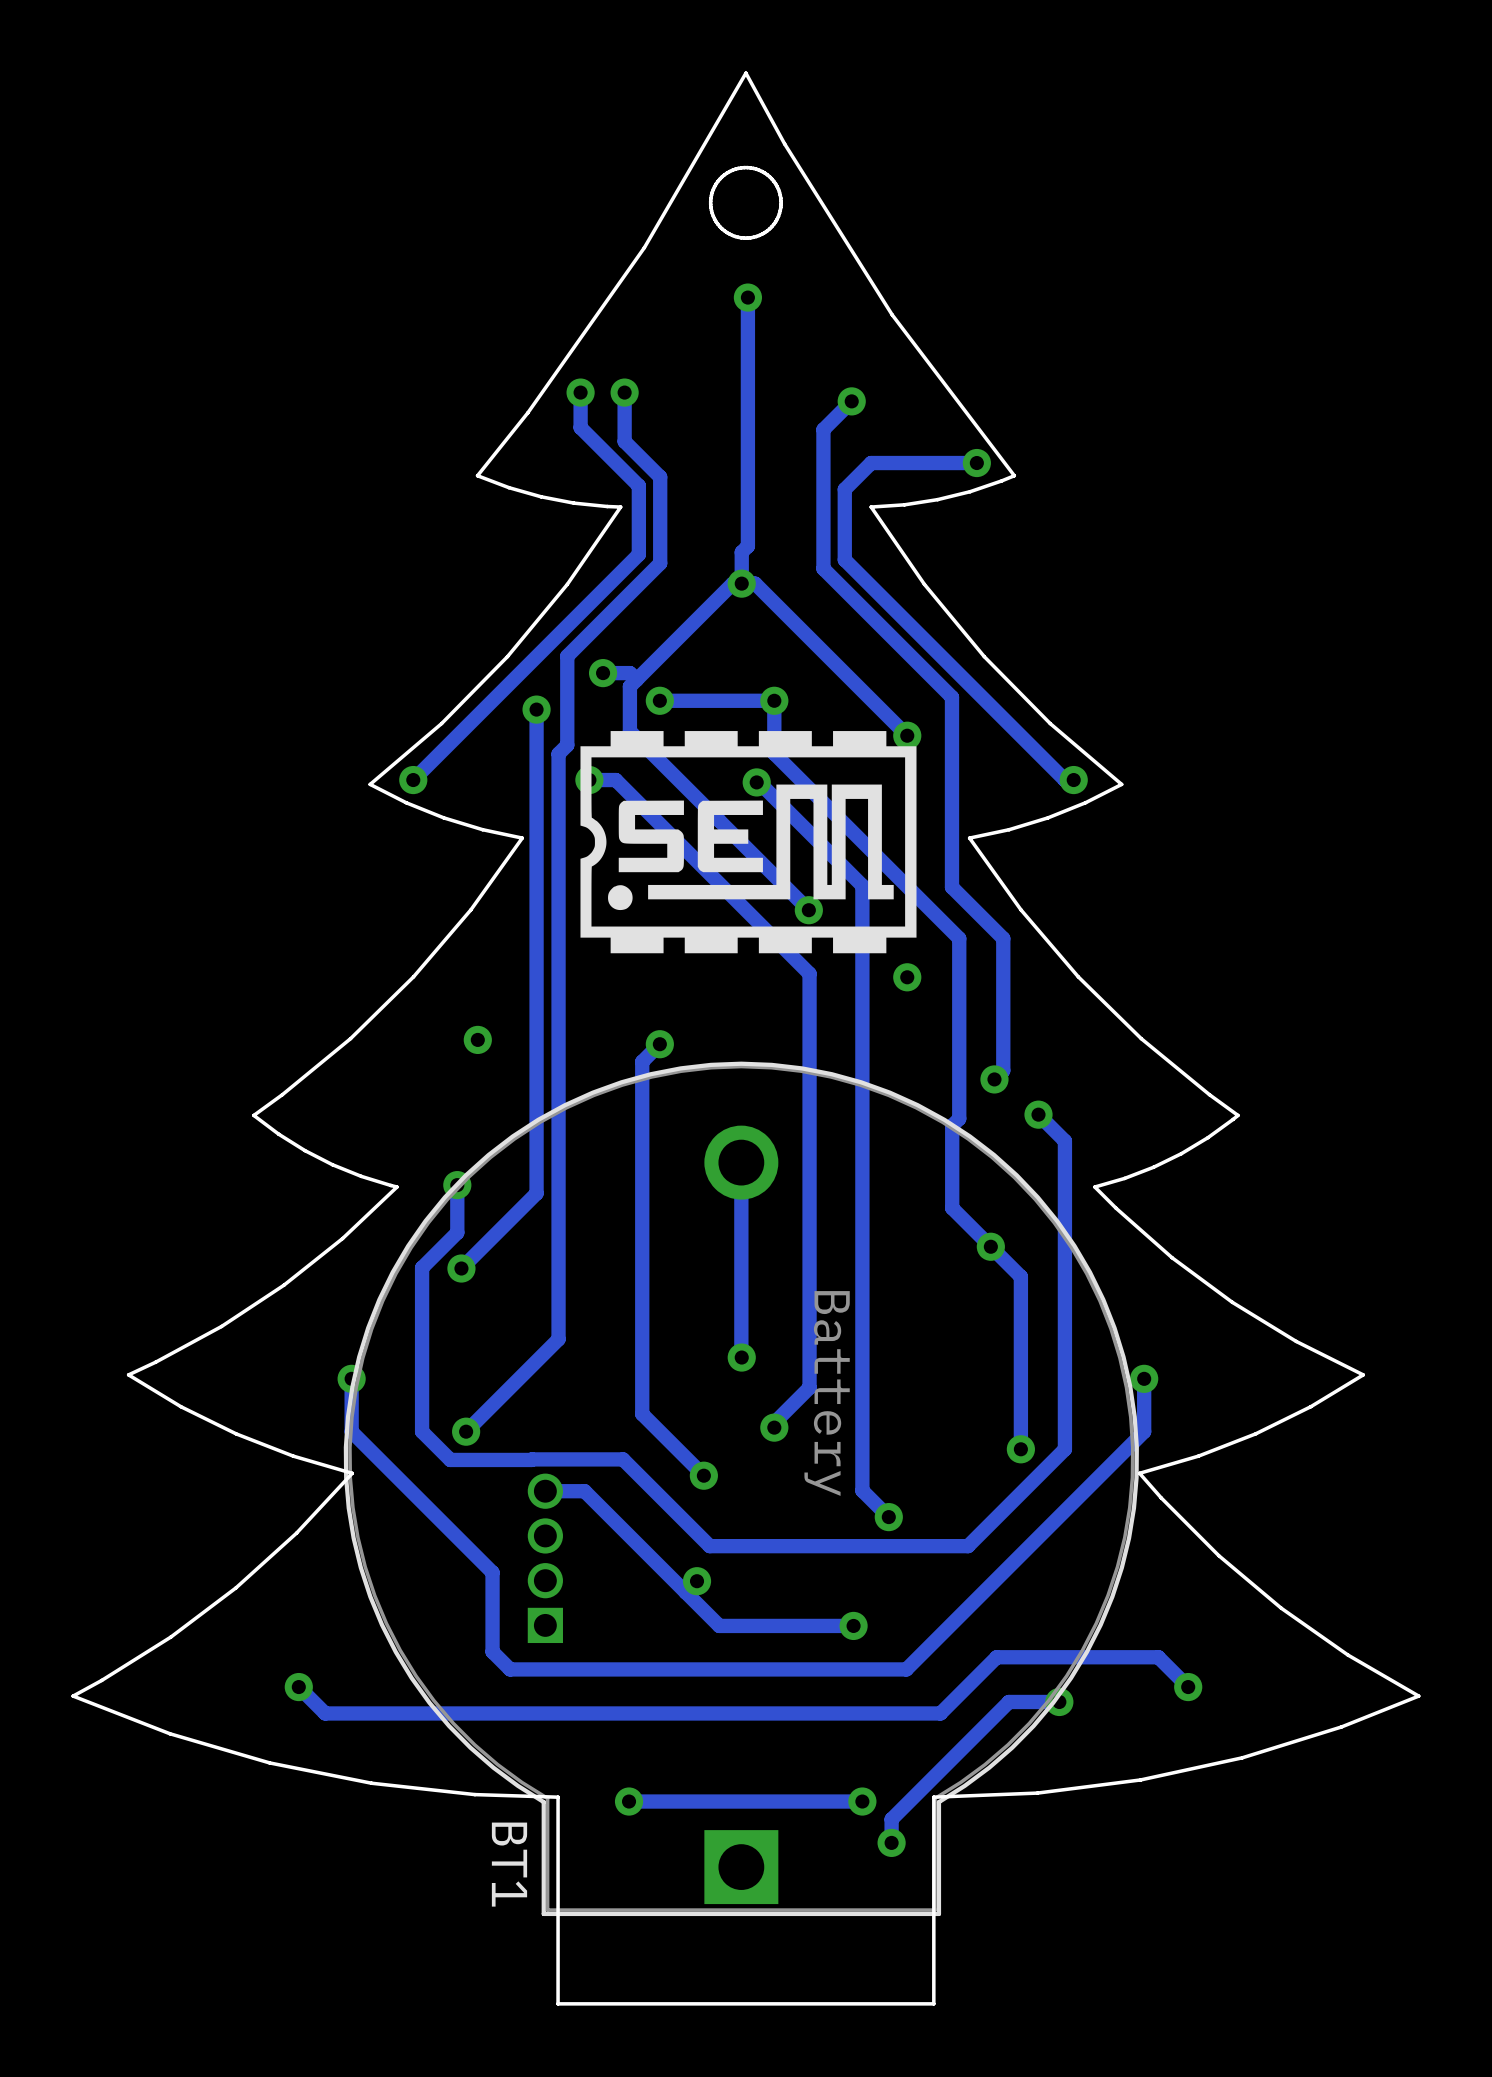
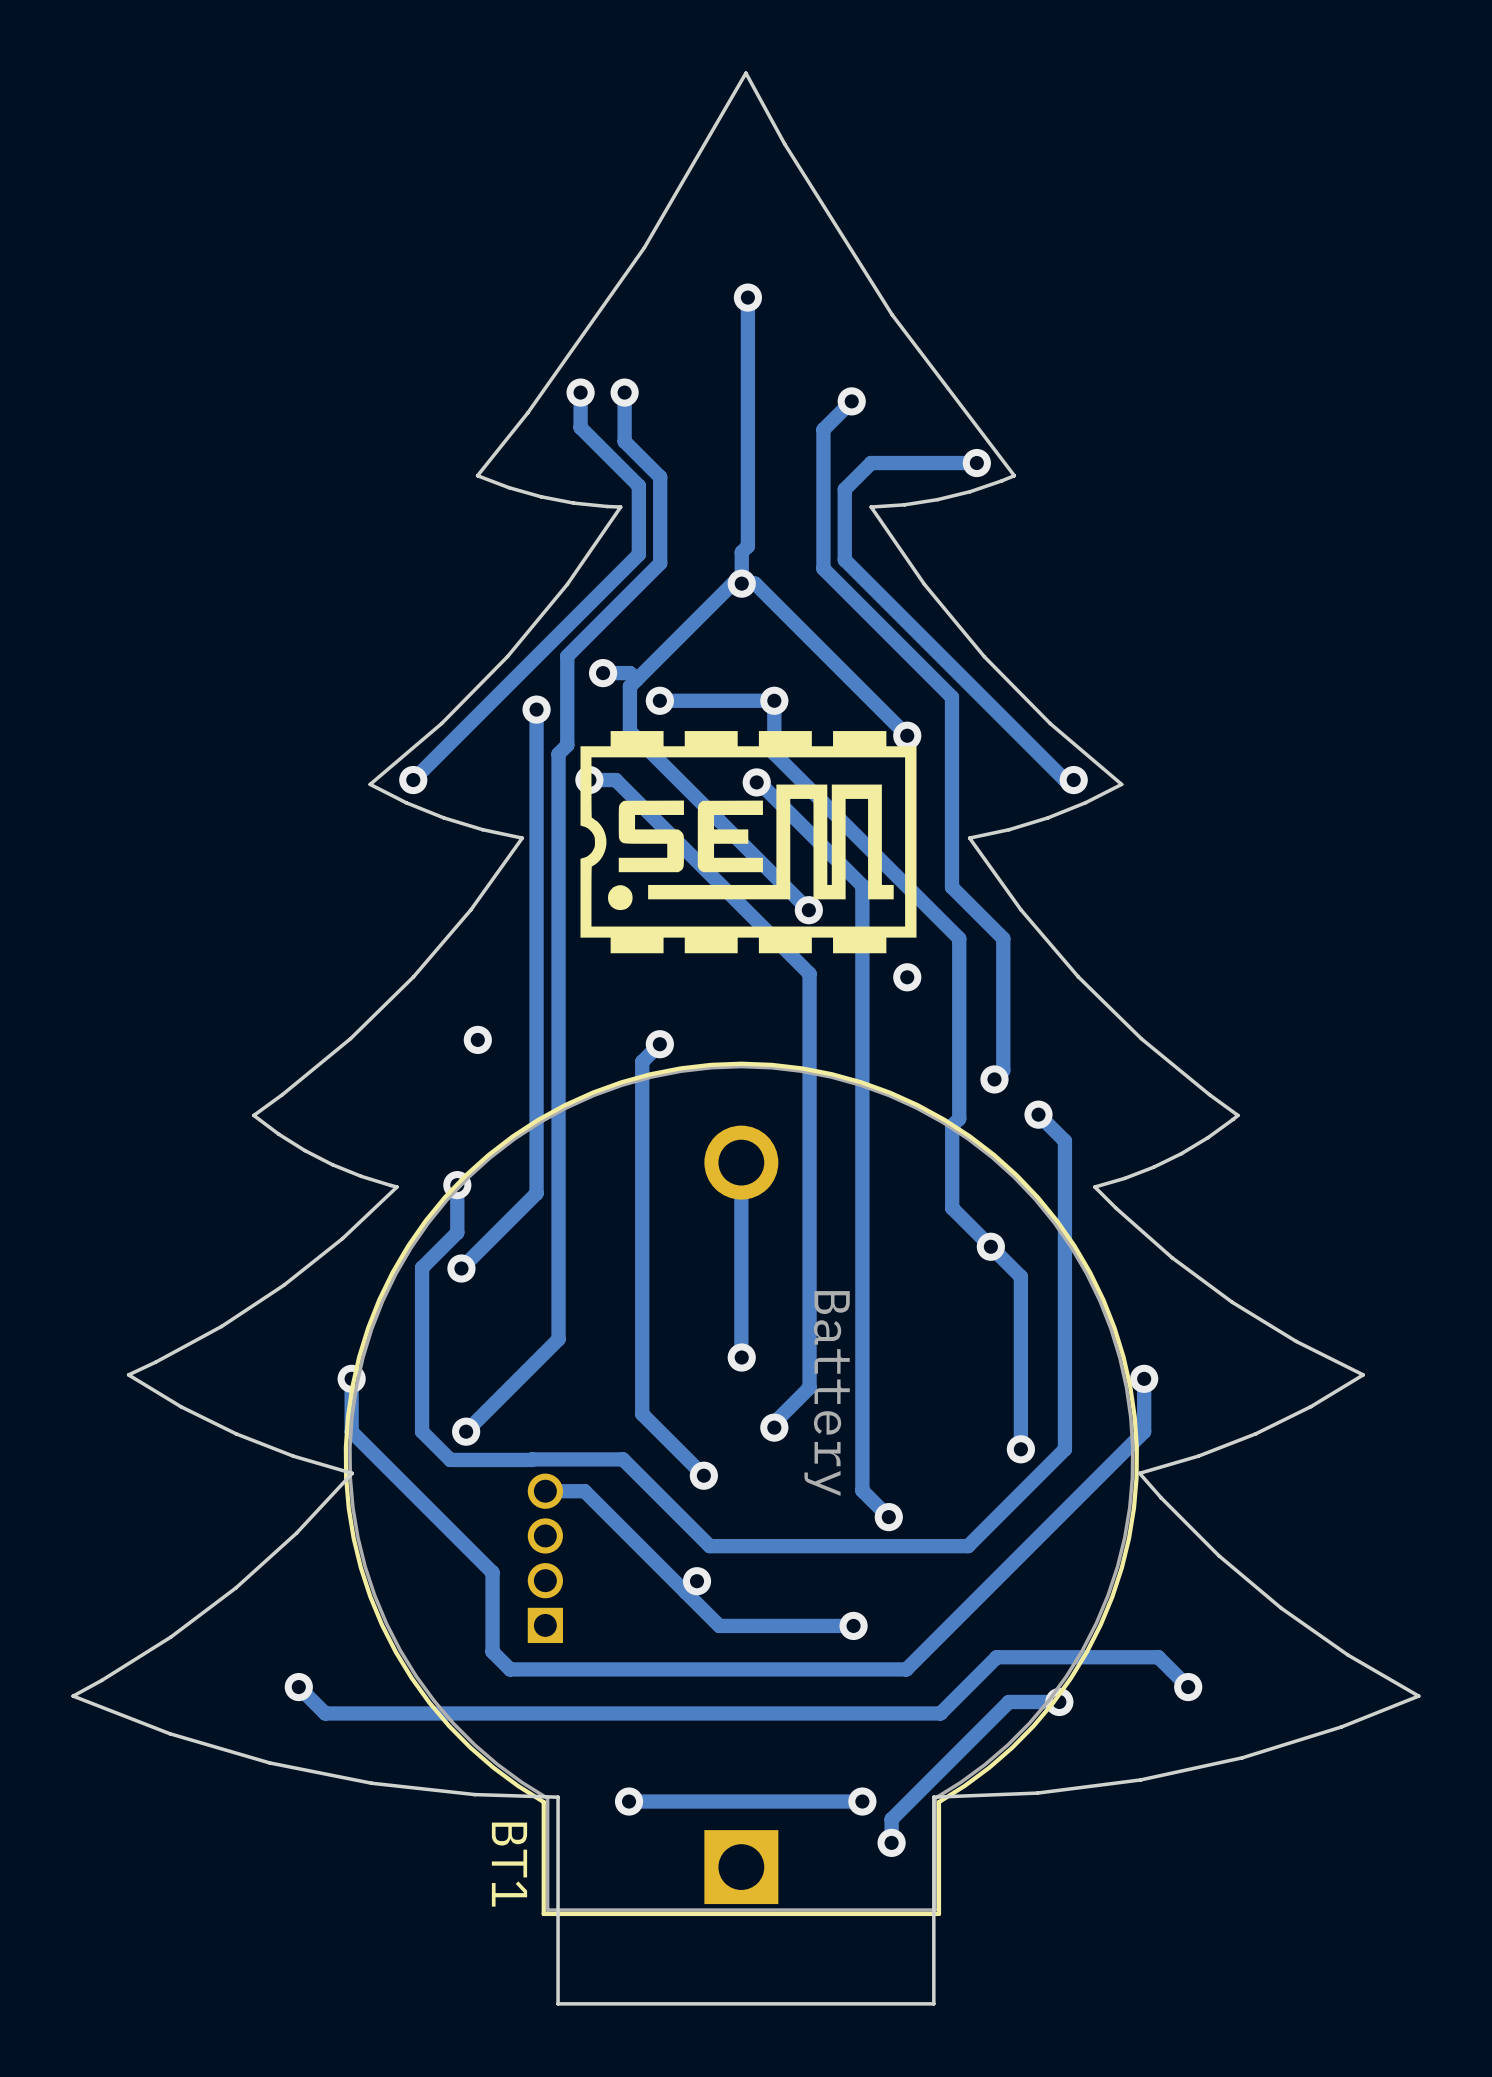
board edge: (747, 167) (735, 169) (722, 176) (714, 186) (710, 201) (713, 216) (719, 226) (732, 235) (744, 238) (756, 236) (769, 228) (778, 216) (781, 204) (778, 189) (771, 179) (762, 171) (747, 167) -> none

